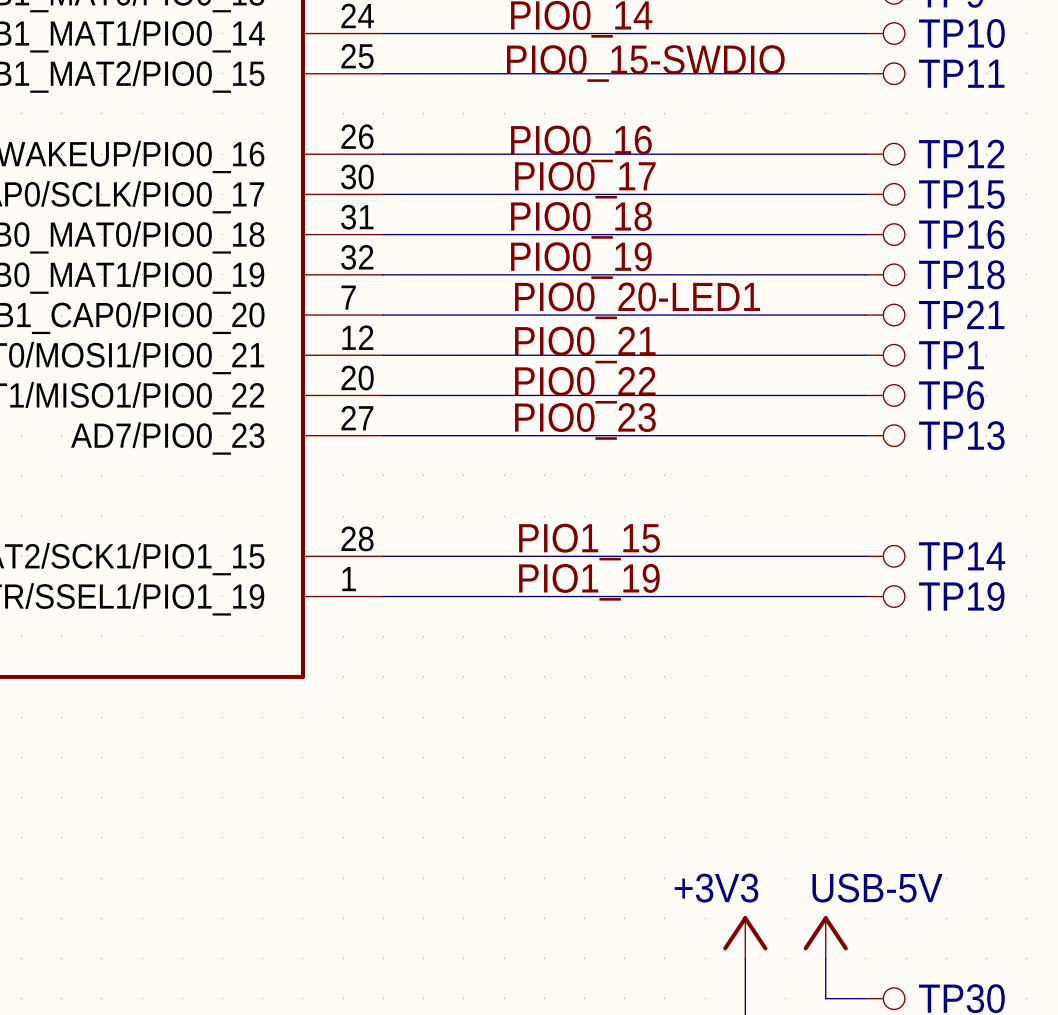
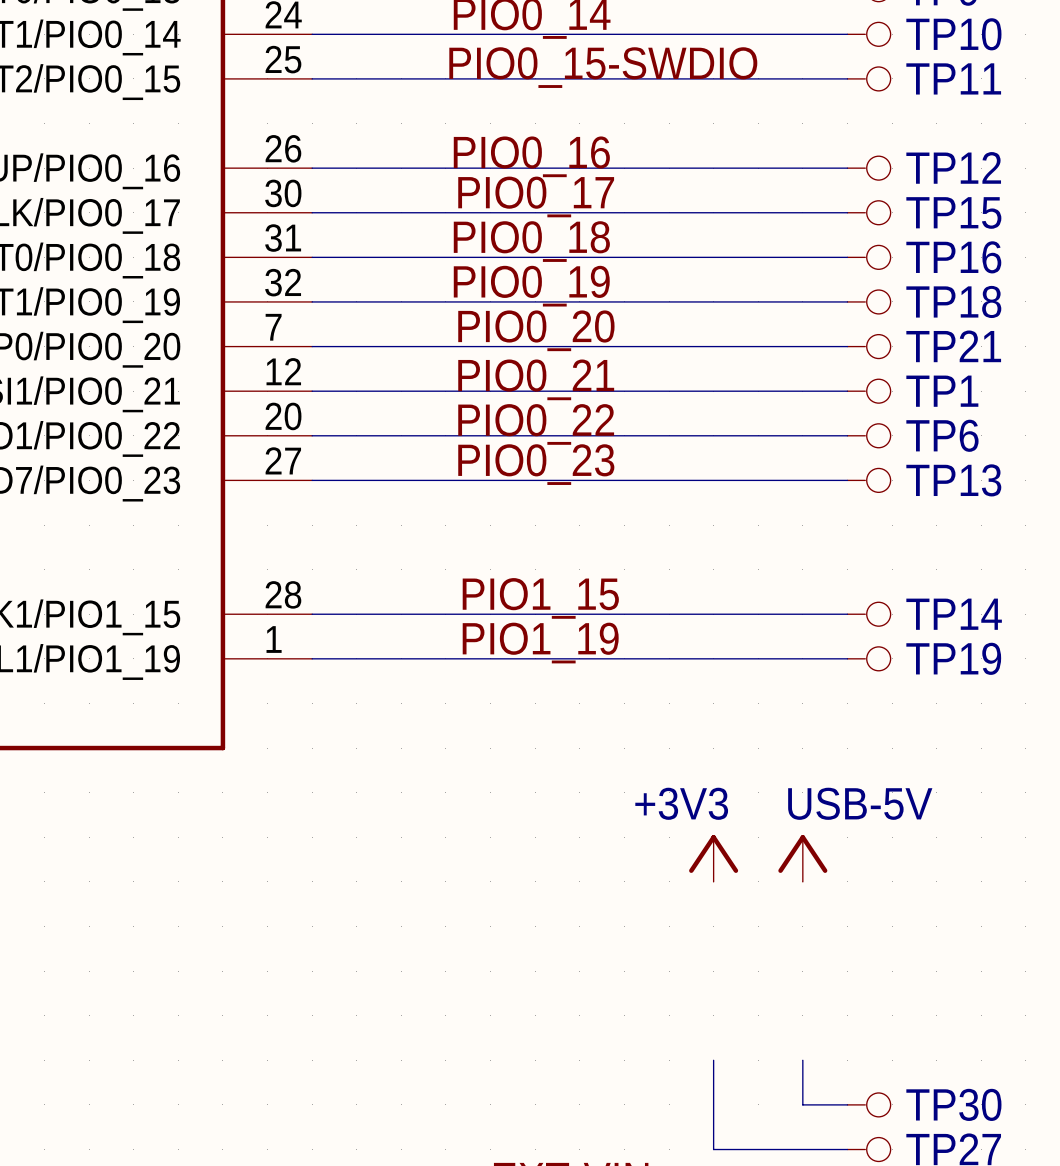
label: PIO0_20-LED1 (637, 300) -> PIO0_20 (536, 330)
power symbol position: +3V3 (745, 937) -> +3V3 (713, 858)
power symbol position: USB-5V (825, 937) -> USB-5V (802, 858)

